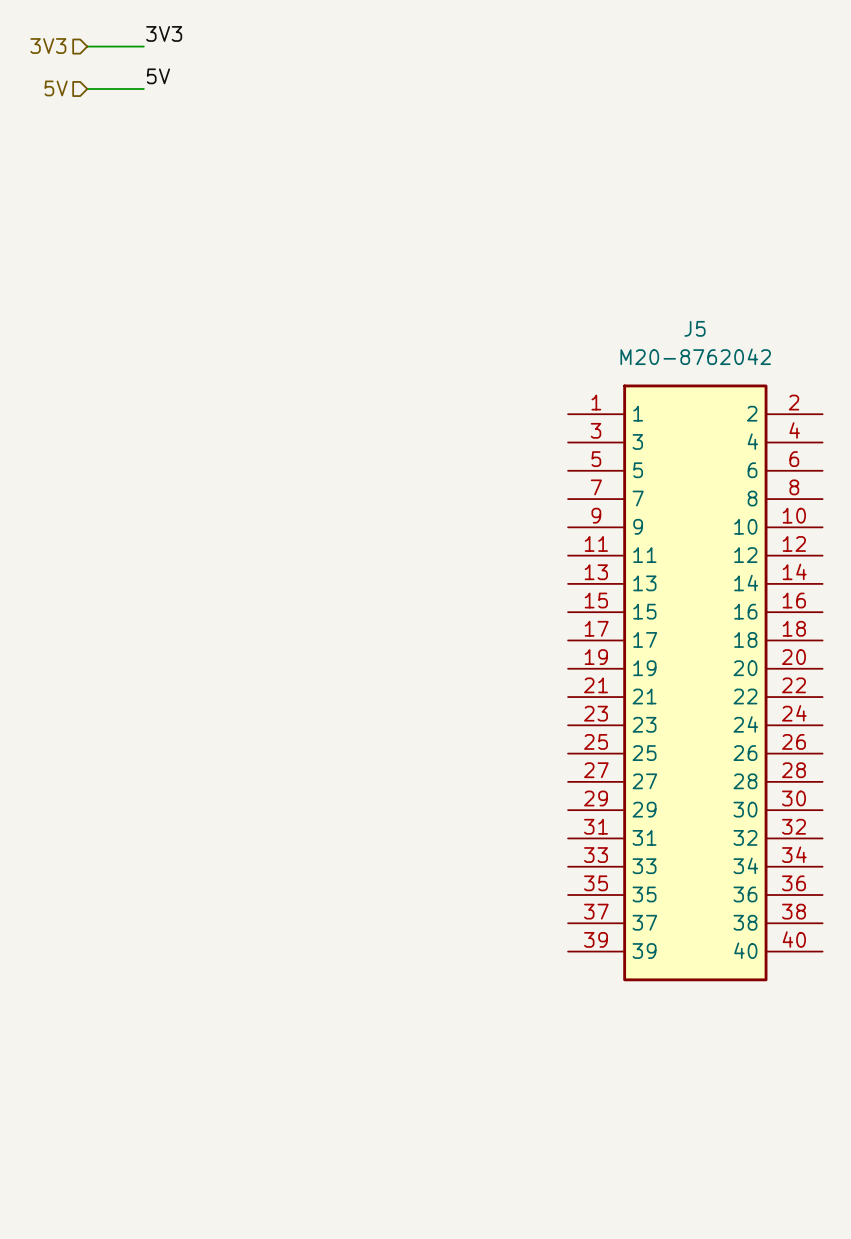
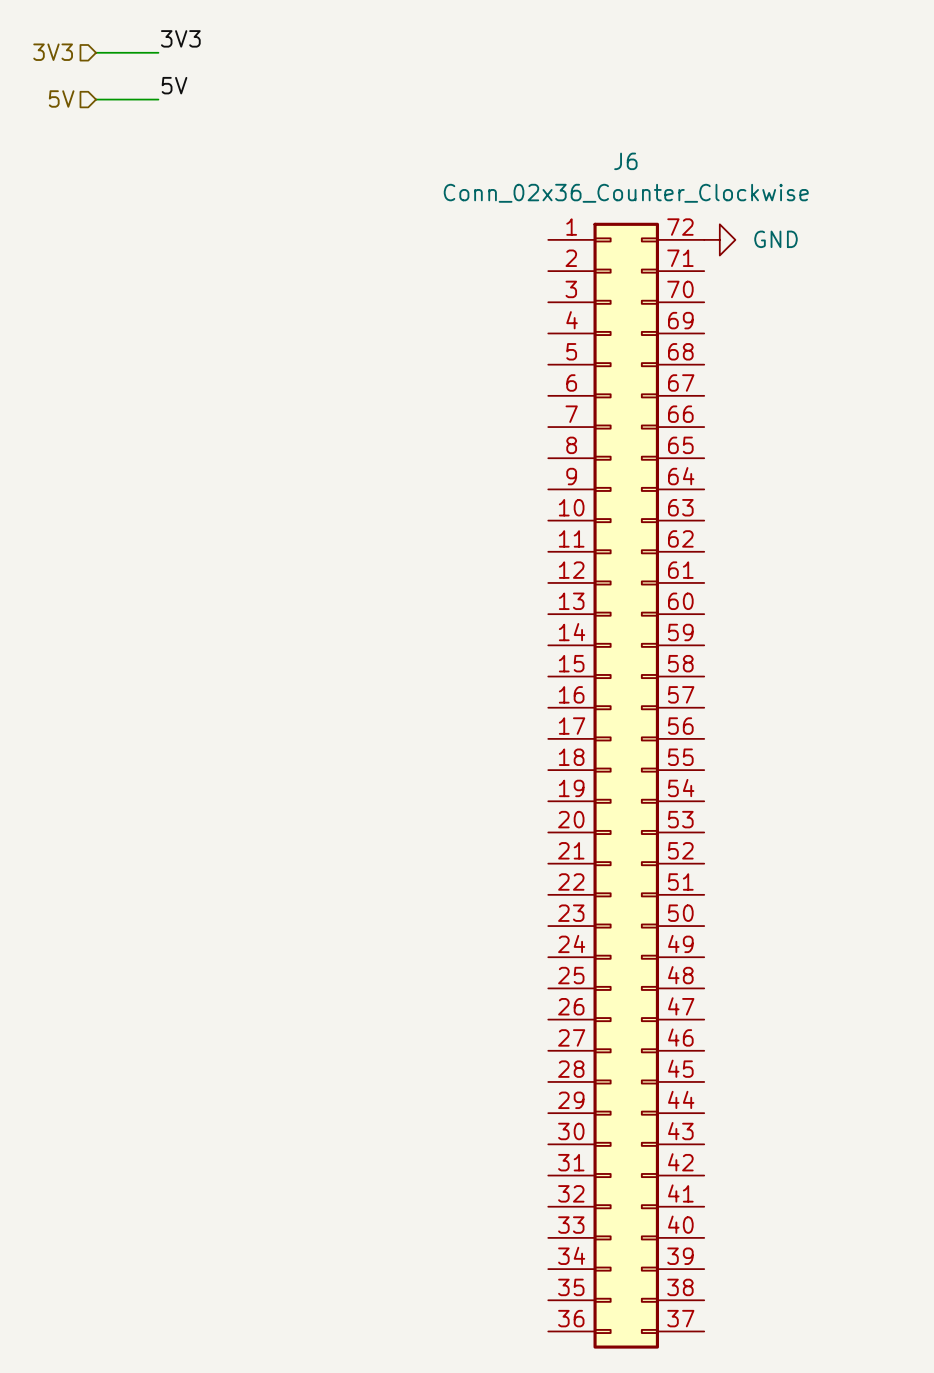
power symbol: none -> GND (719, 239)
J5: M20-8762042 (695, 682) -> none
J6: none -> Conn_02x36_Counter_Clockwise (626, 785)

